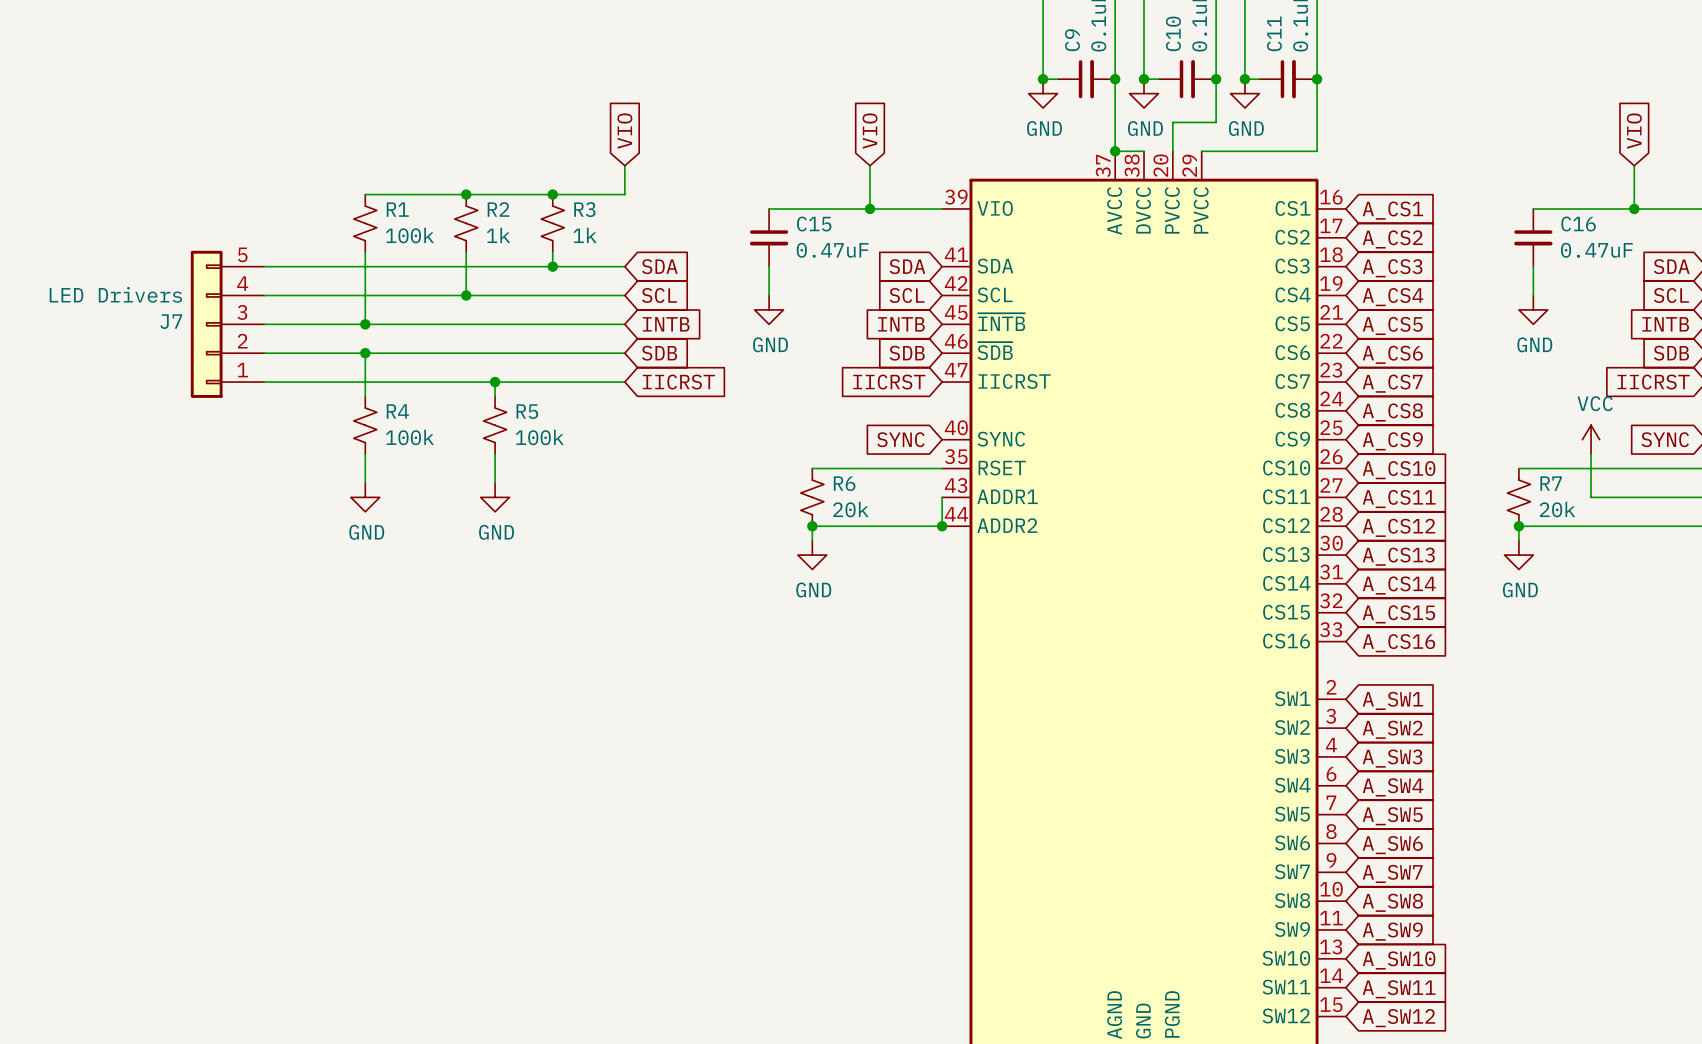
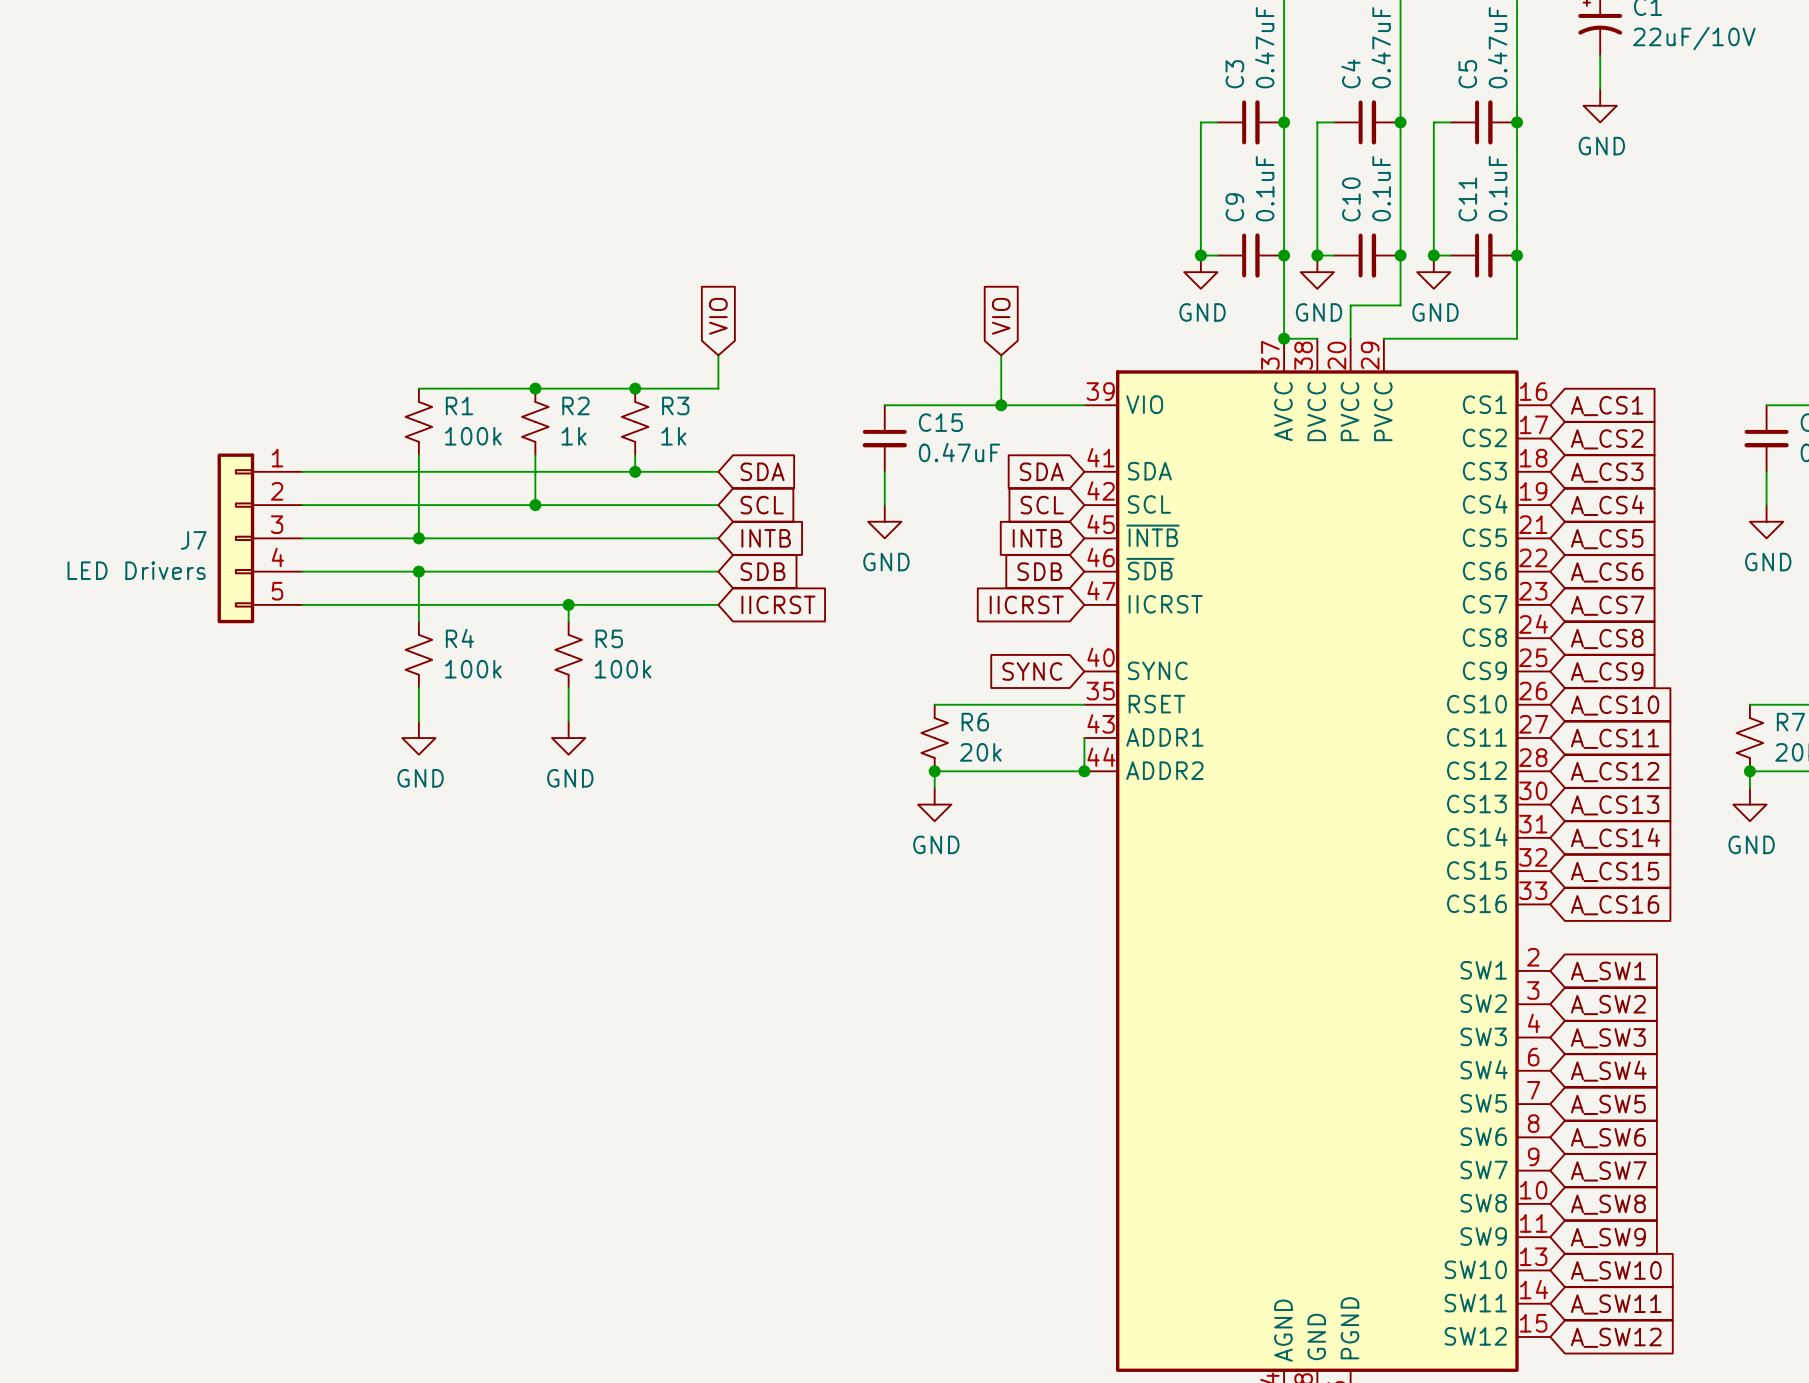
J7 flip: as is (206, 324) -> up-down (235, 538)

